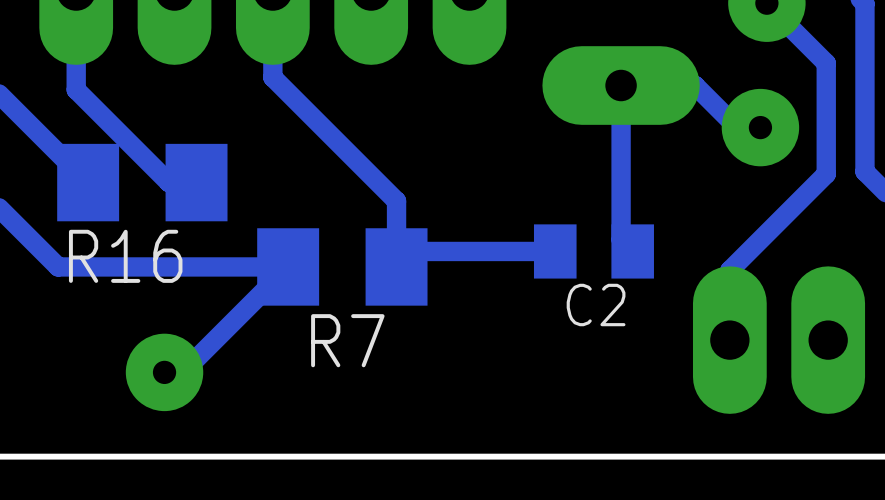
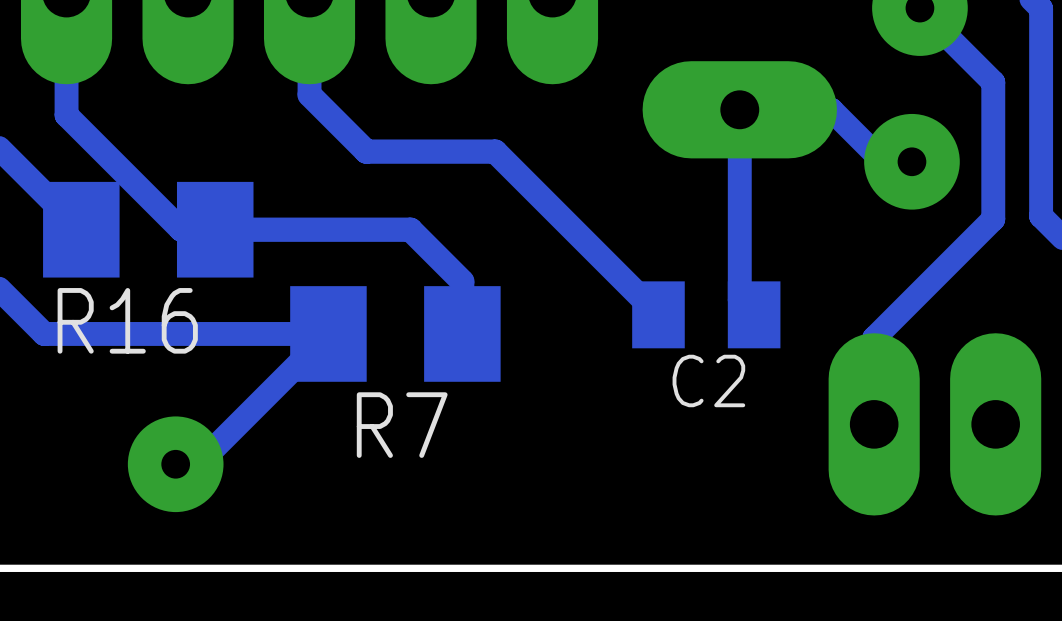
track: (272, 73) (272, 77) (396, 201) (396, 224) -> (215, 229) (410, 229) (462, 281)
track: (555, 251) (412, 251) (396, 266) -> (658, 314) (495, 151) (366, 151) (309, 94)

